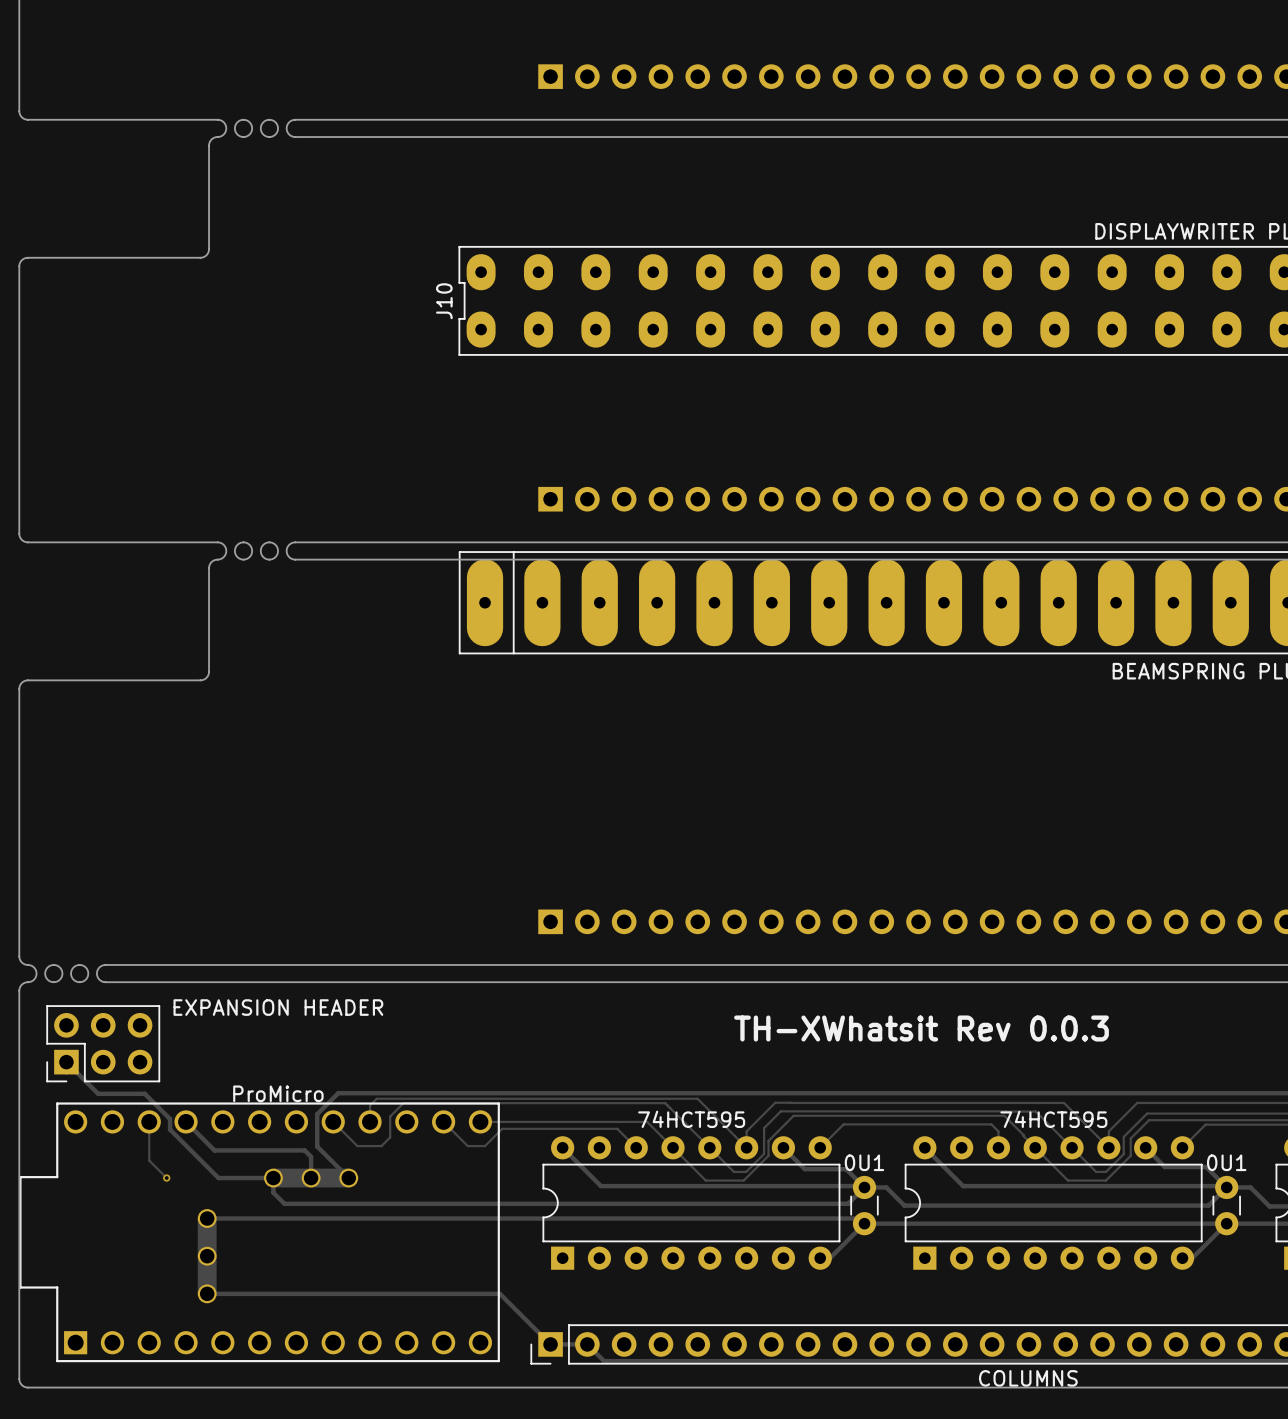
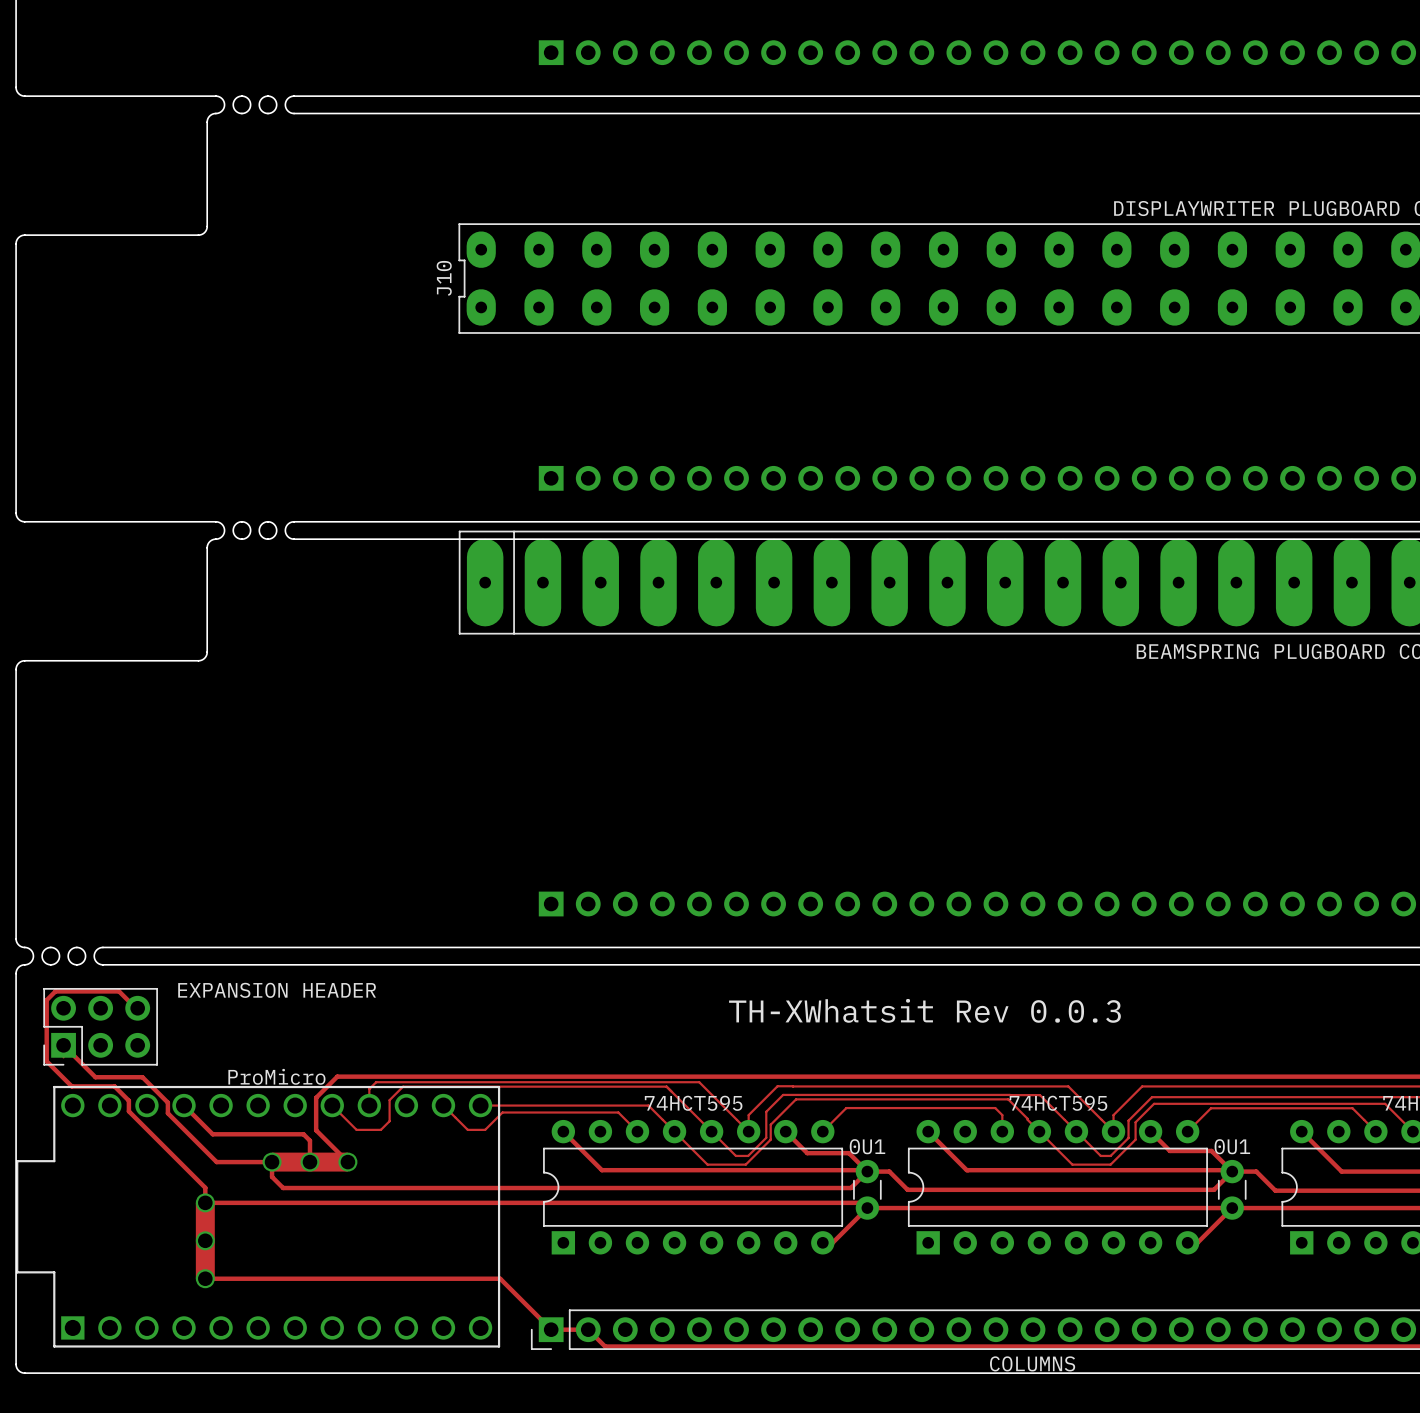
track: none -> (137, 1008) (119, 991) (55, 991) (46, 1000) (46, 1061) (71, 1086) (114, 1086) (128, 1100) (128, 1111) (205, 1187) (205, 1202)
track: (149, 1121) (149, 1160) (166, 1178) -> none
via: (166, 1178) -> none

